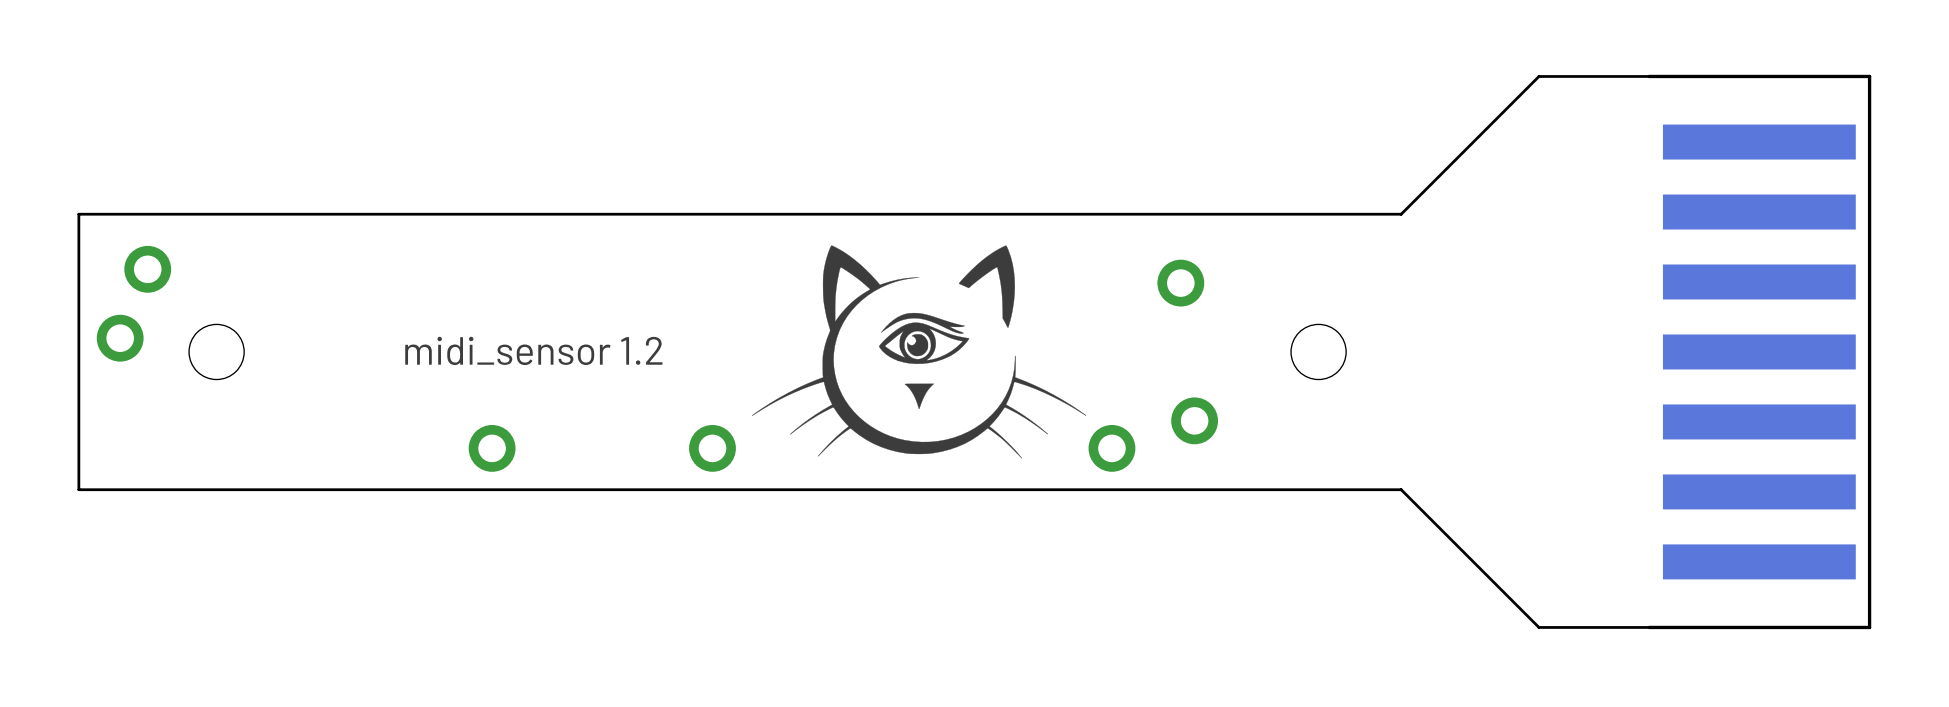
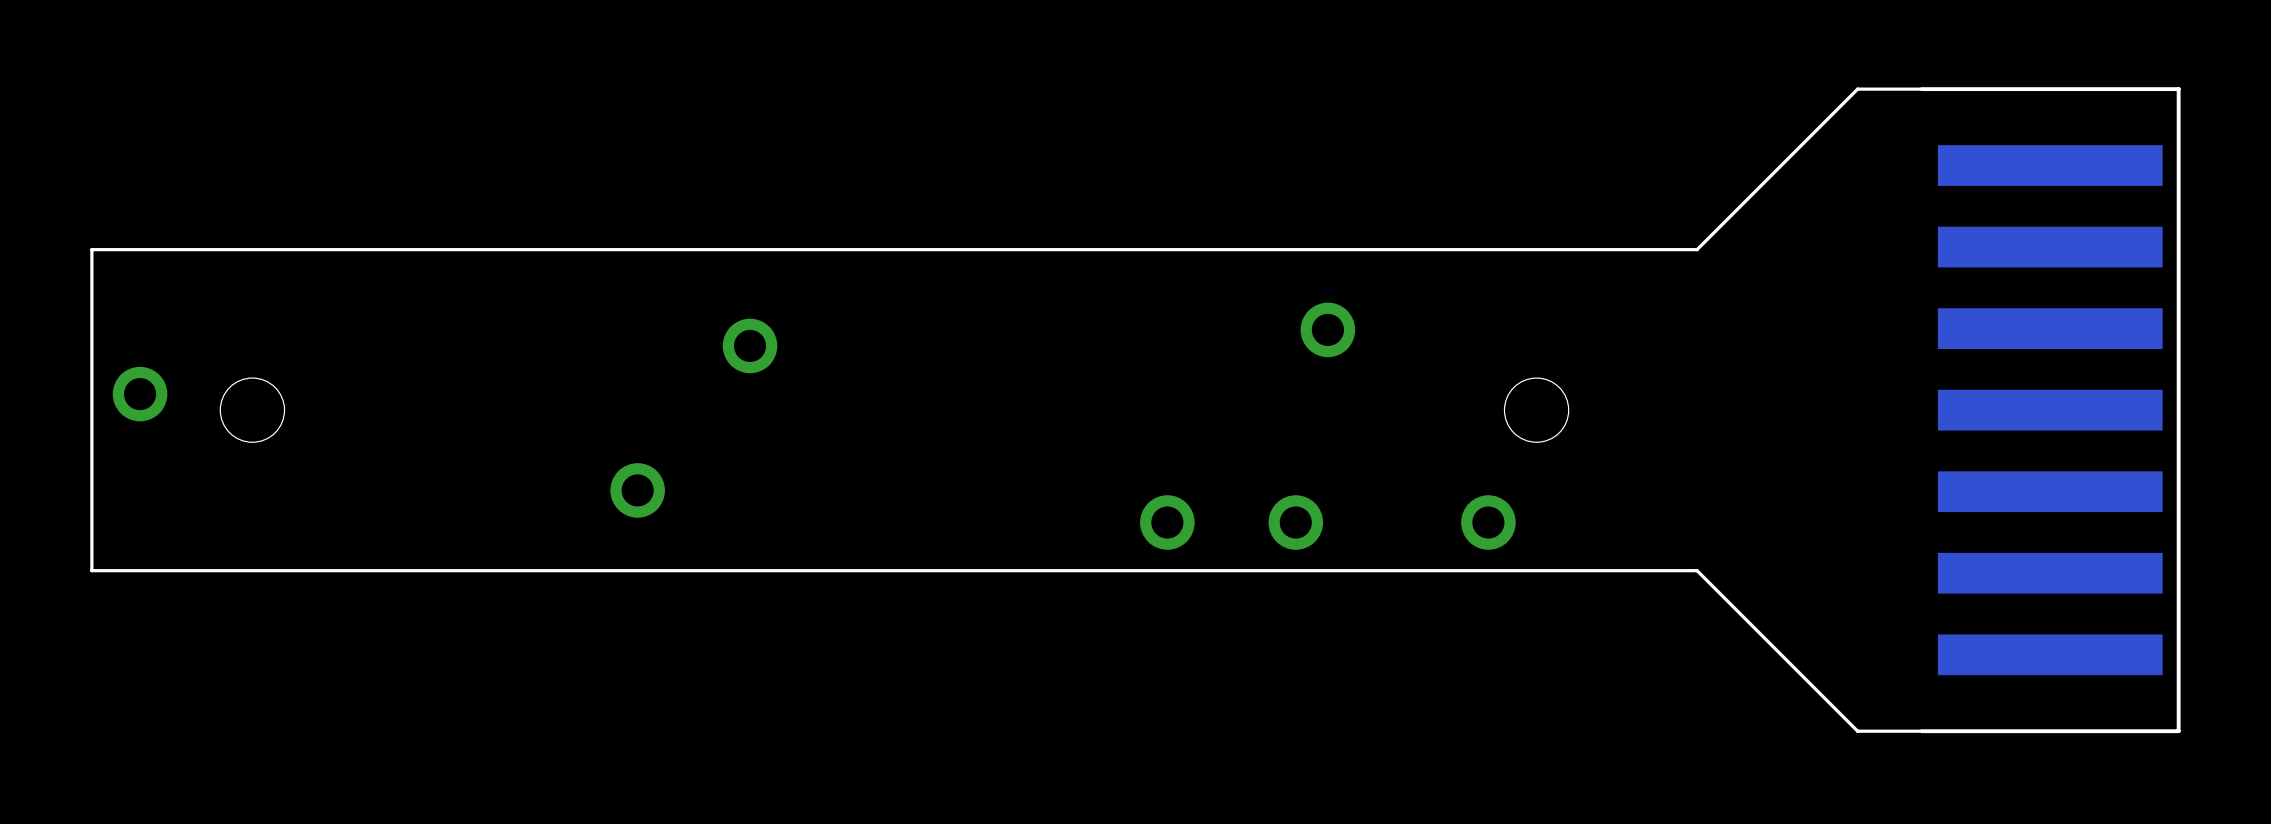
board edge: (1594, 76) (1538, 76) (1401, 214) -> (1857, 89) (1697, 249) (1632, 249)
drawing: [752, 245, 1087, 459] -> none
part: (147, 269) -> none
part position: (1180, 283) -> (1327, 329)
part: none -> (750, 345)
text: midi_sensor 1.2 (533, 350) -> none
part: (1194, 420) -> none
part position: (492, 448) -> (637, 490)
part: (712, 448) -> none
part: none -> (1167, 522)
part: none -> (1488, 522)
board edge: (1401, 489) (1538, 627) (1594, 627) -> (1632, 570) (1697, 570) (1857, 731)

